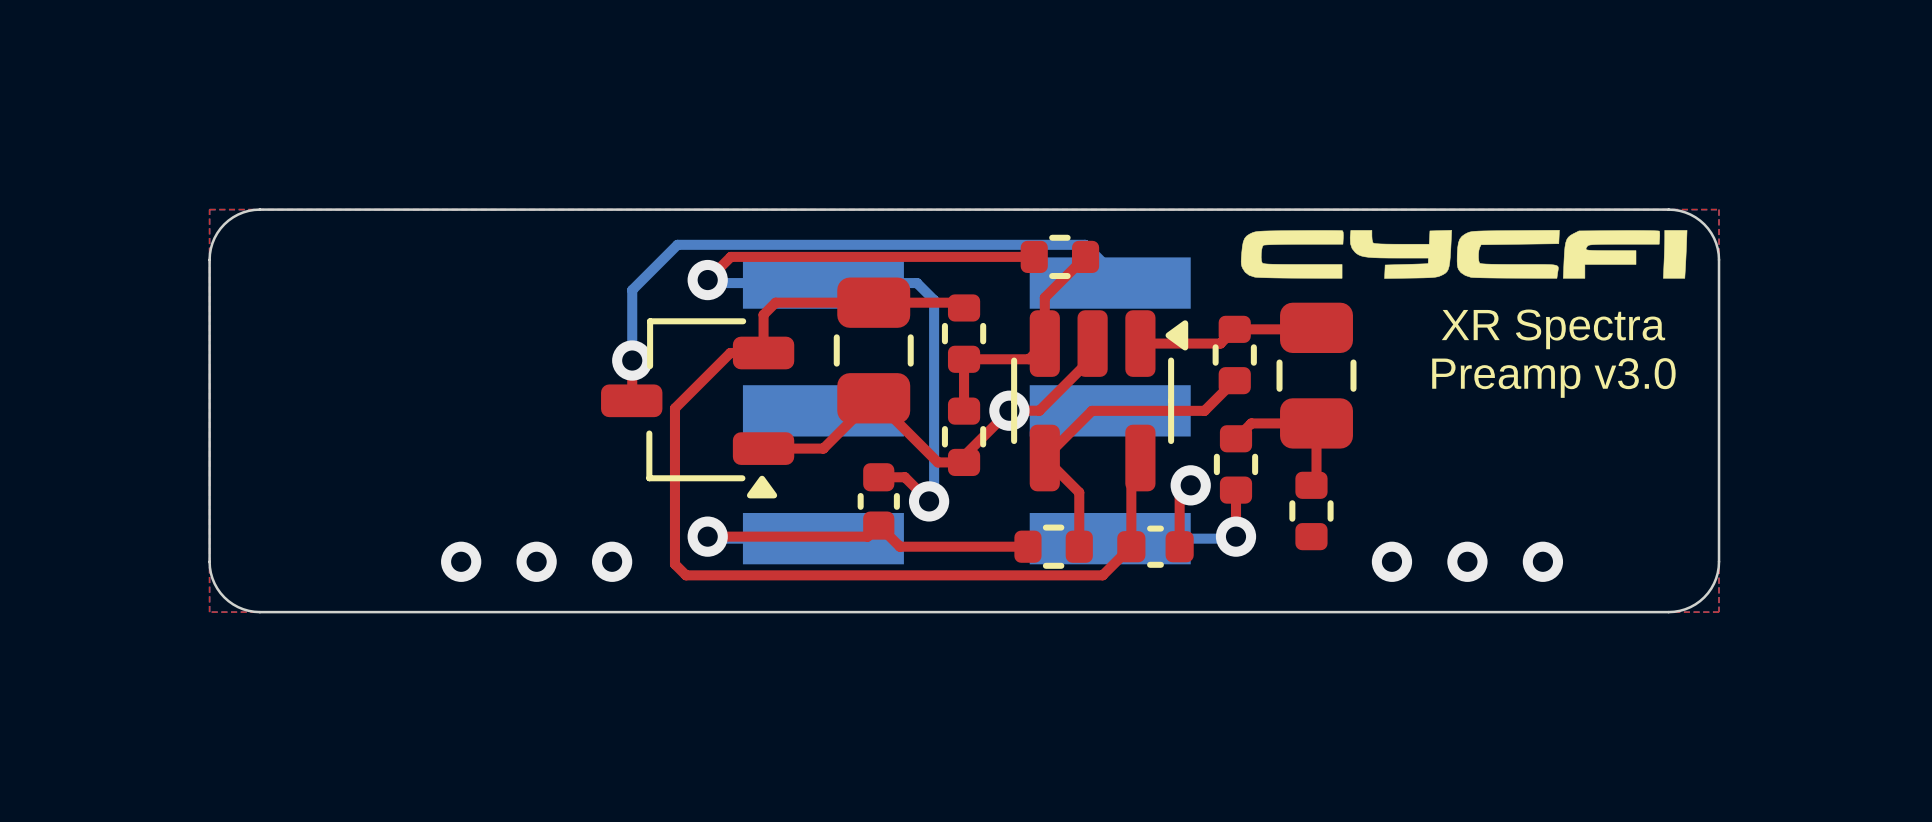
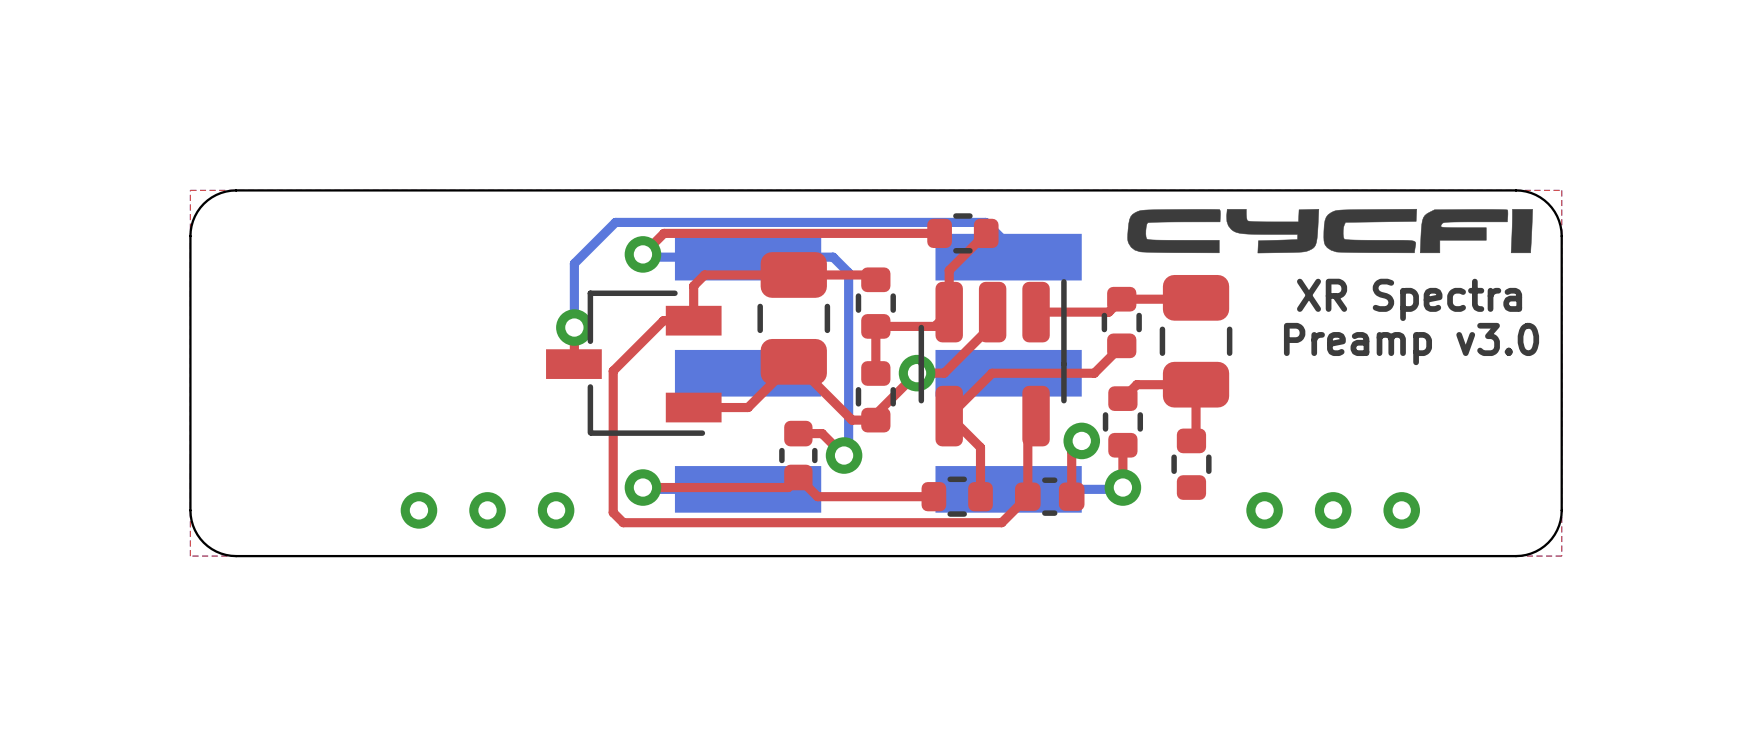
part footprint: [1011, 310, 1189, 492] -> [918, 279, 1067, 447]
part footprint: [601, 318, 795, 499] -> [546, 290, 722, 436]

